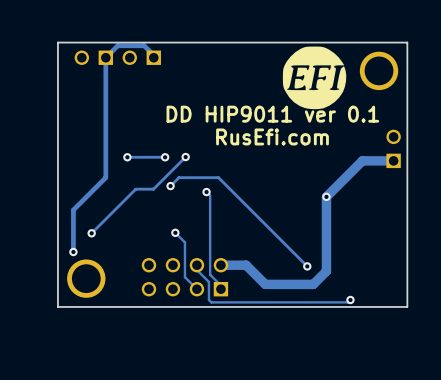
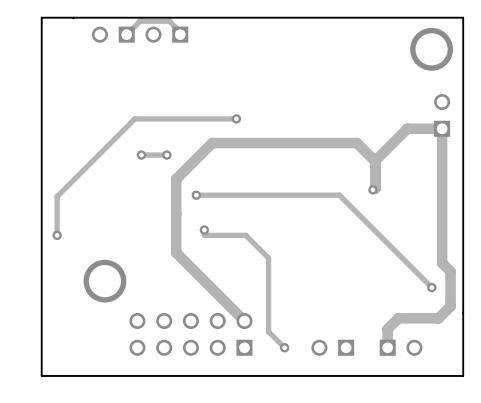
board edge: (57, 42) (57, 306) (407, 306) -> (73, 17) (41, 17) (41, 375) (463, 375) (463, 312)
drawing: [282, 46, 347, 110] -> none
track: (105, 57) (105, 177) (73, 210) (73, 252) -> none
text: DD HIP9011 ver 0.1 (272, 114) -> none
track: none -> (236, 118) (134, 118) (57, 196) (57, 235)
via: none -> (236, 118)
text: RusEfi.com (272, 136) -> none
part position: (393, 148) -> (442, 115)
via: (127, 157) -> none
track: (165, 157) (127, 157) -> none
via: (165, 157) -> none
track: (185, 157) (153, 189) (135, 189) (91, 233) -> none
via: (185, 157) -> none
track: (393, 160) (362, 160) (326, 196) (326, 271) (313, 284) (265, 284) (246, 265) (220, 265) -> none
via: none -> (141, 155)
track: none -> (166, 155) (141, 155)
via: none -> (166, 155)
track: none -> (375, 161) (356, 143) (212, 143) (176, 179) (176, 252) (244, 321)
track: (170, 186) (178, 177) (218, 177) (307, 266) -> none
via position: (170, 186) -> (196, 195)
track: (206, 192) (210, 195) (210, 274) (220, 285) (220, 289) -> none
via: (206, 192) -> none
track: none -> (375, 188) (375, 160) (407, 128) (442, 128) (442, 263) (450, 271) (450, 306) (438, 318) (398, 318) (387, 329) (387, 347)
track: none -> (196, 195) (339, 195) (431, 287)
track: (175, 232) (184, 242) (184, 277) (196, 289) -> none
via: (91, 233) -> none
via: none -> (57, 235)
track: none -> (204, 235) (245, 235) (268, 258) (268, 331) (284, 347)
via: (73, 252) -> none
track: (196, 265) (196, 270) (208, 281) (208, 299) (211, 302) (348, 302) (350, 299) -> none
via: (307, 266) -> none
part: (184, 277) -> none
via position: (350, 299) -> (431, 287)
part: none -> (190, 334)
via: none -> (284, 347)
part: none -> (332, 347)
part: none -> (401, 347)

